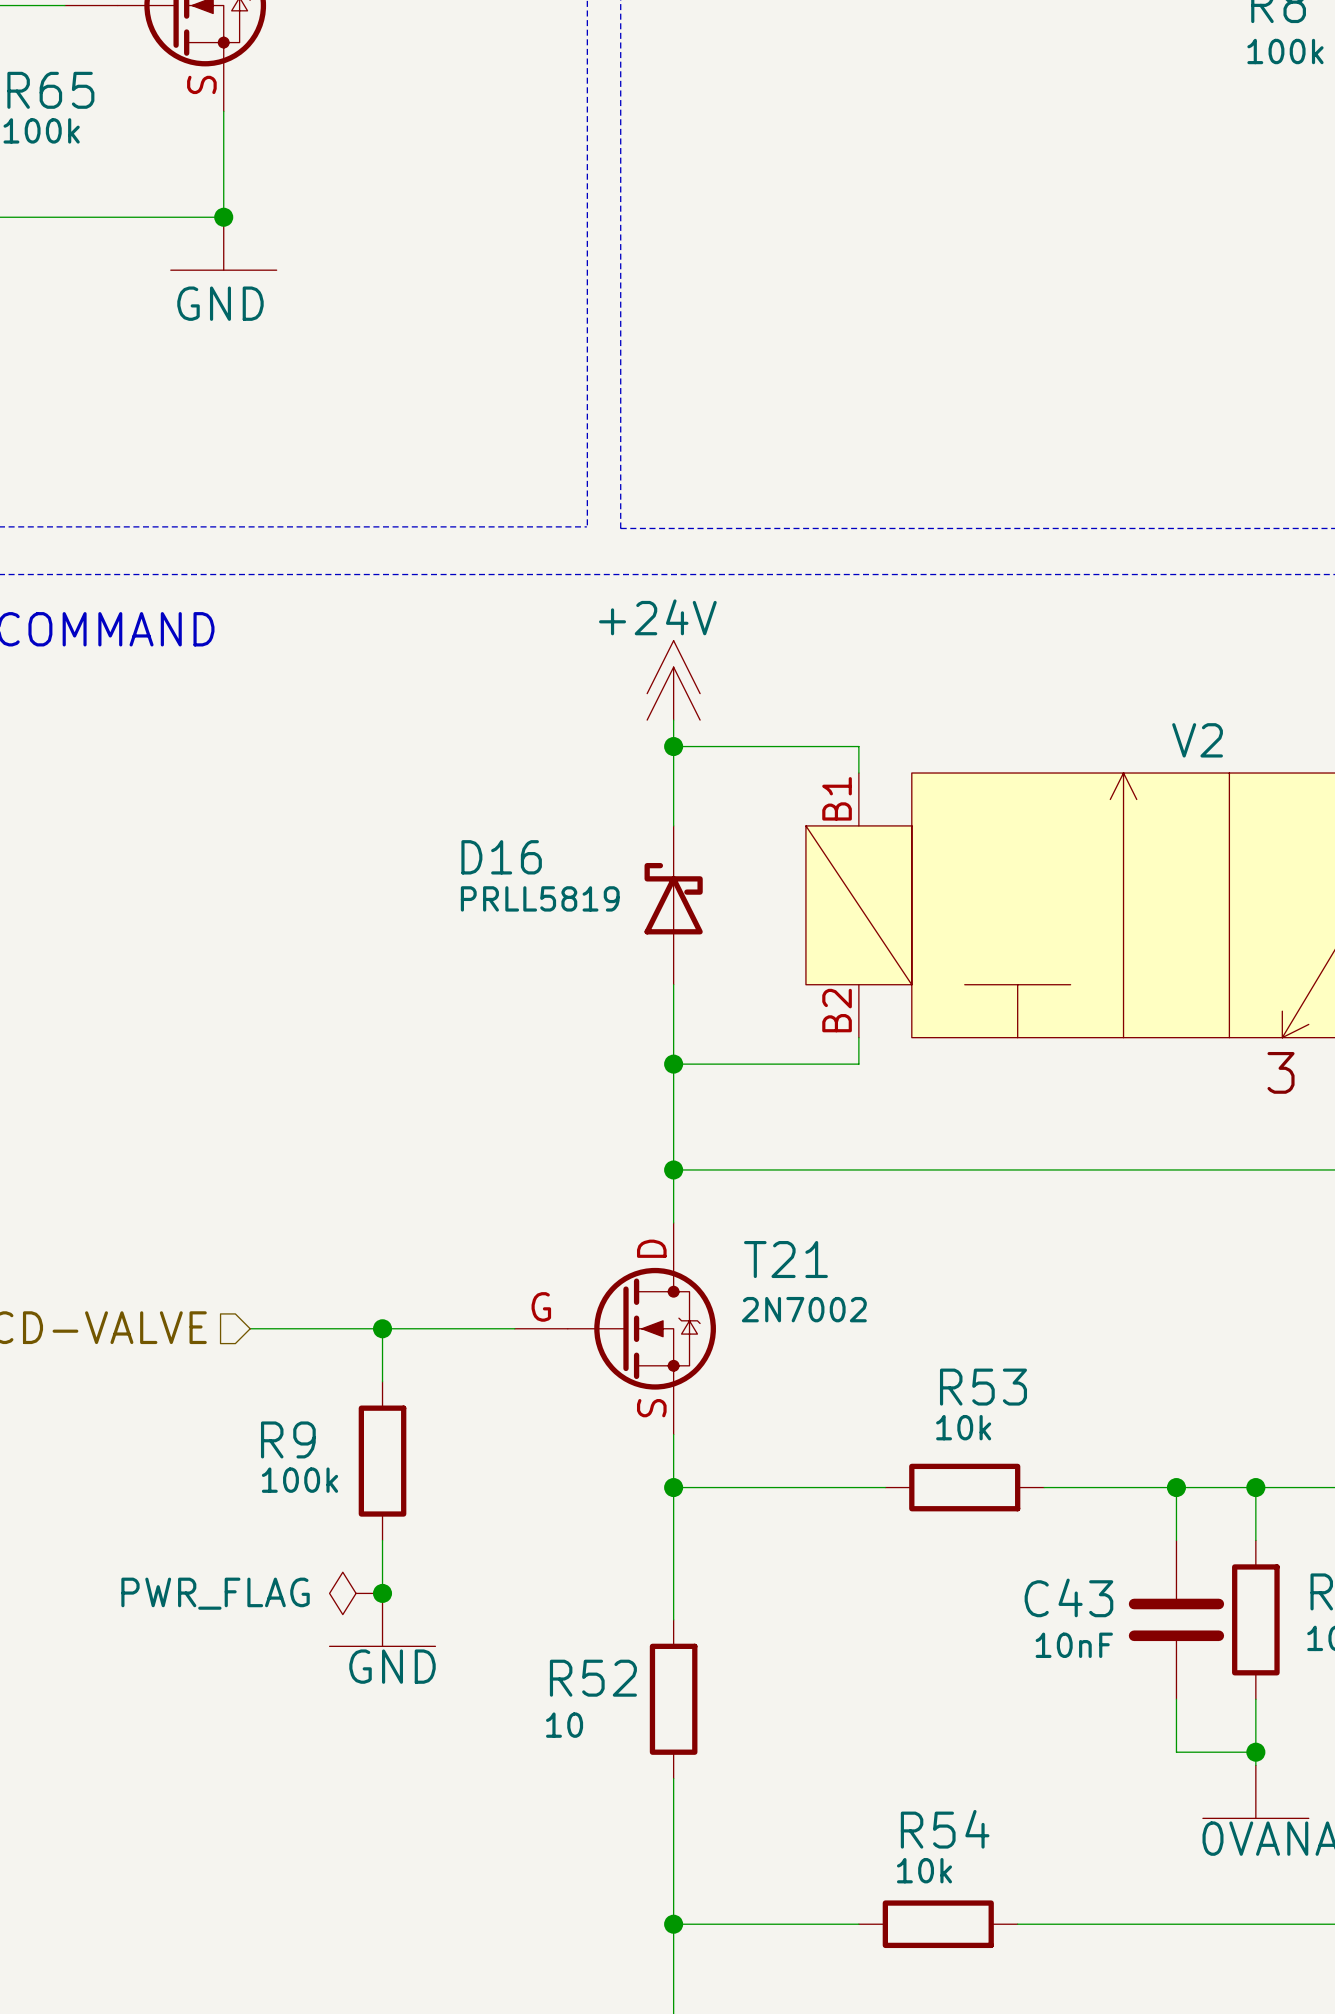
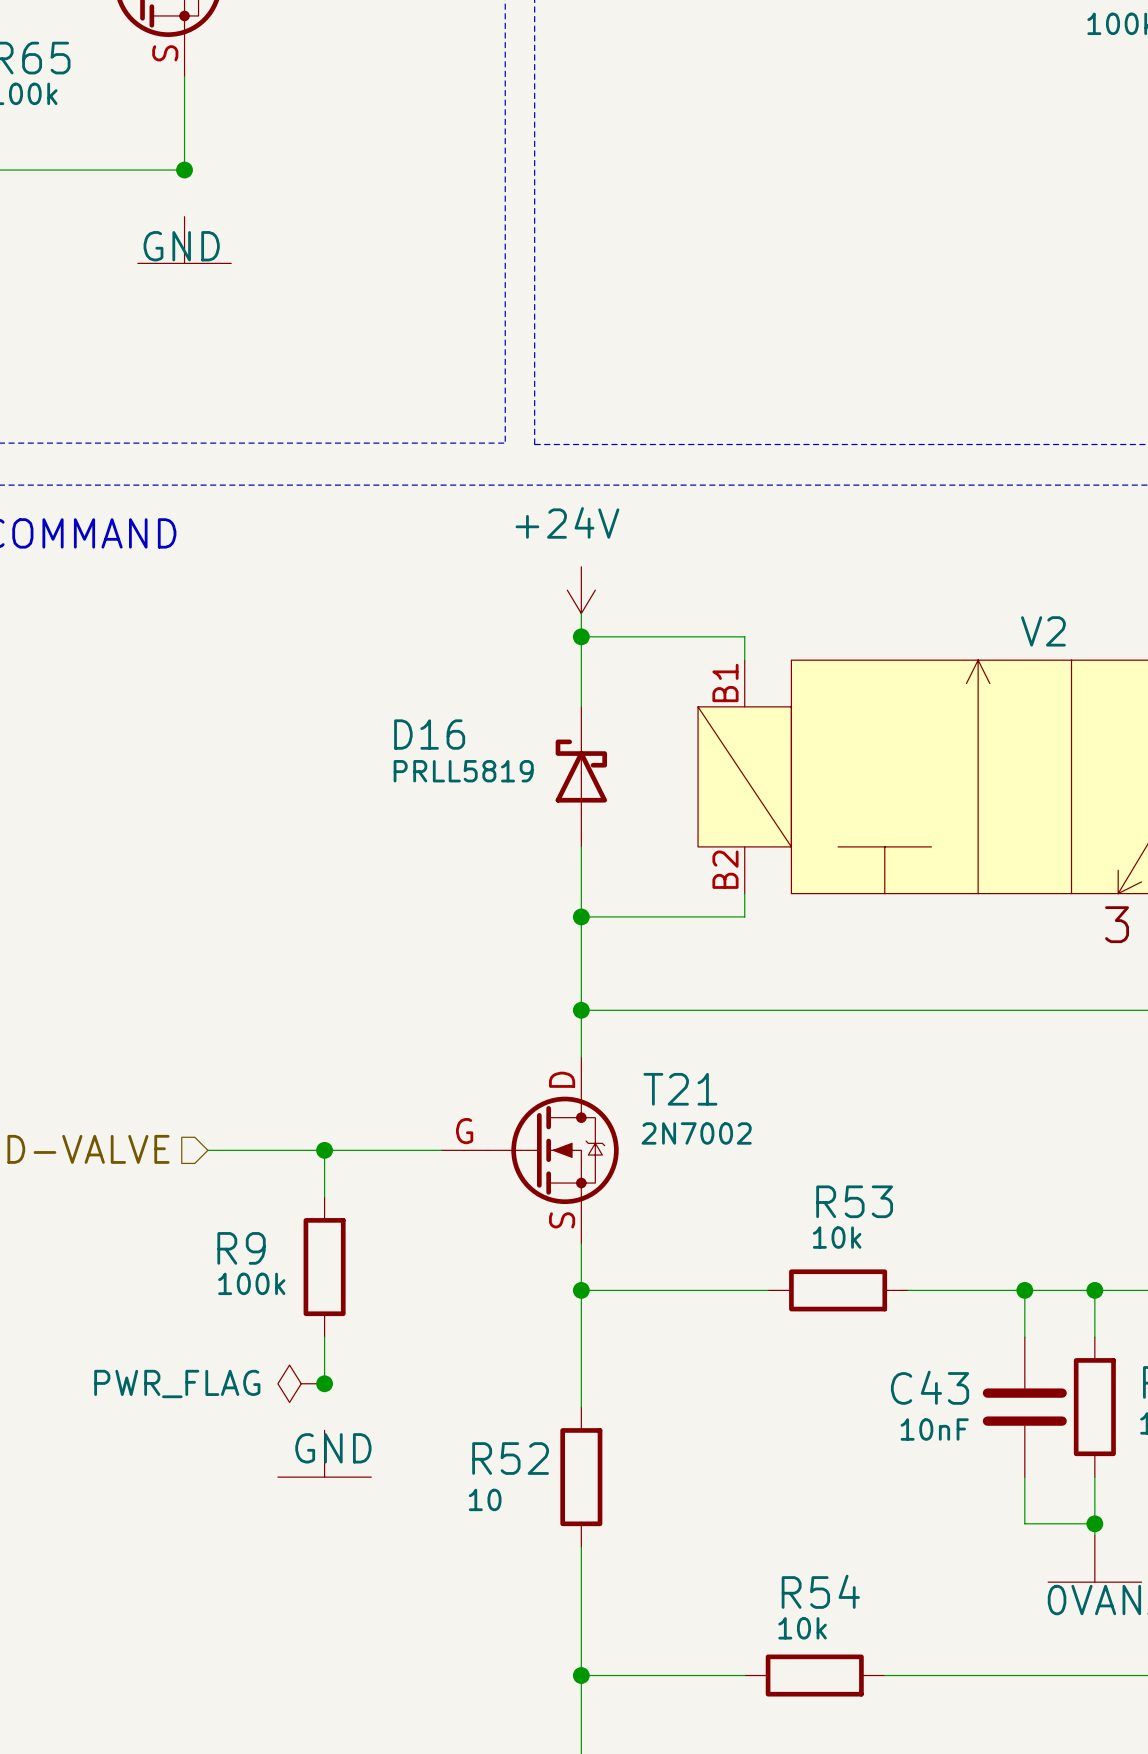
power symbol position: GND (223, 243) -> GND (184, 240)
power symbol shape: [647, 640, 701, 721] -> [567, 566, 596, 614]
power symbol position: GND (382, 1619) -> GND (324, 1453)

